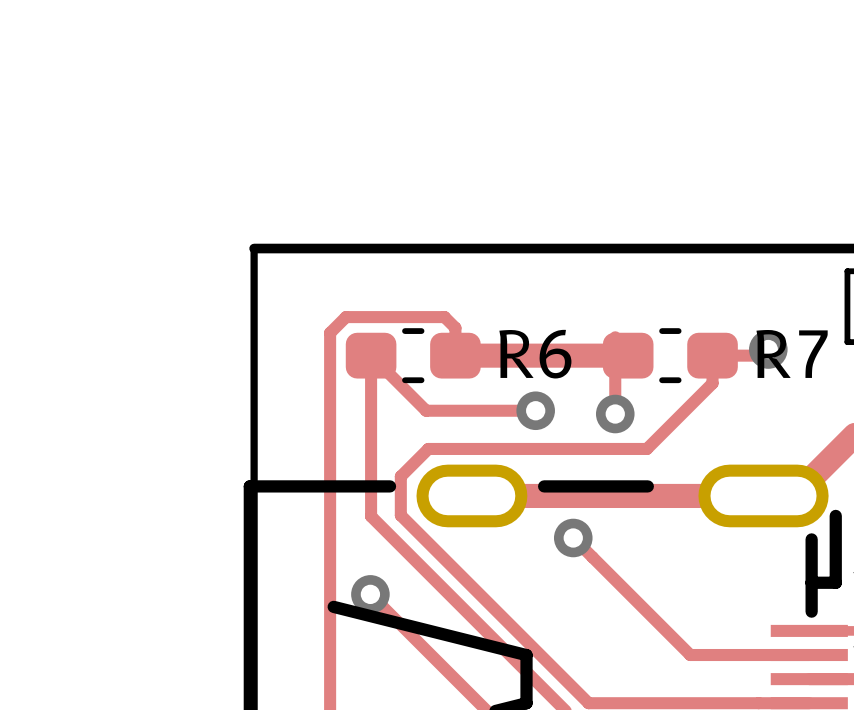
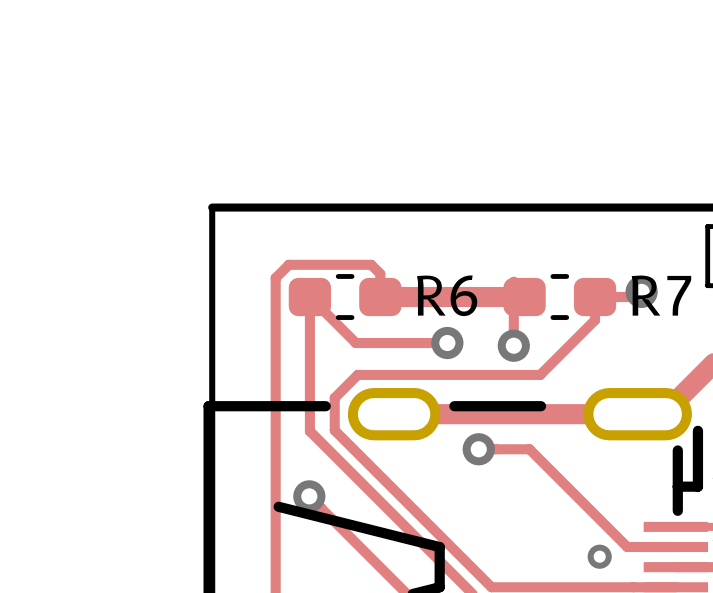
track: (573, 537) (690, 655) (751, 655) -> (478, 449) (529, 449) (627, 547)
via: none -> (599, 556)

